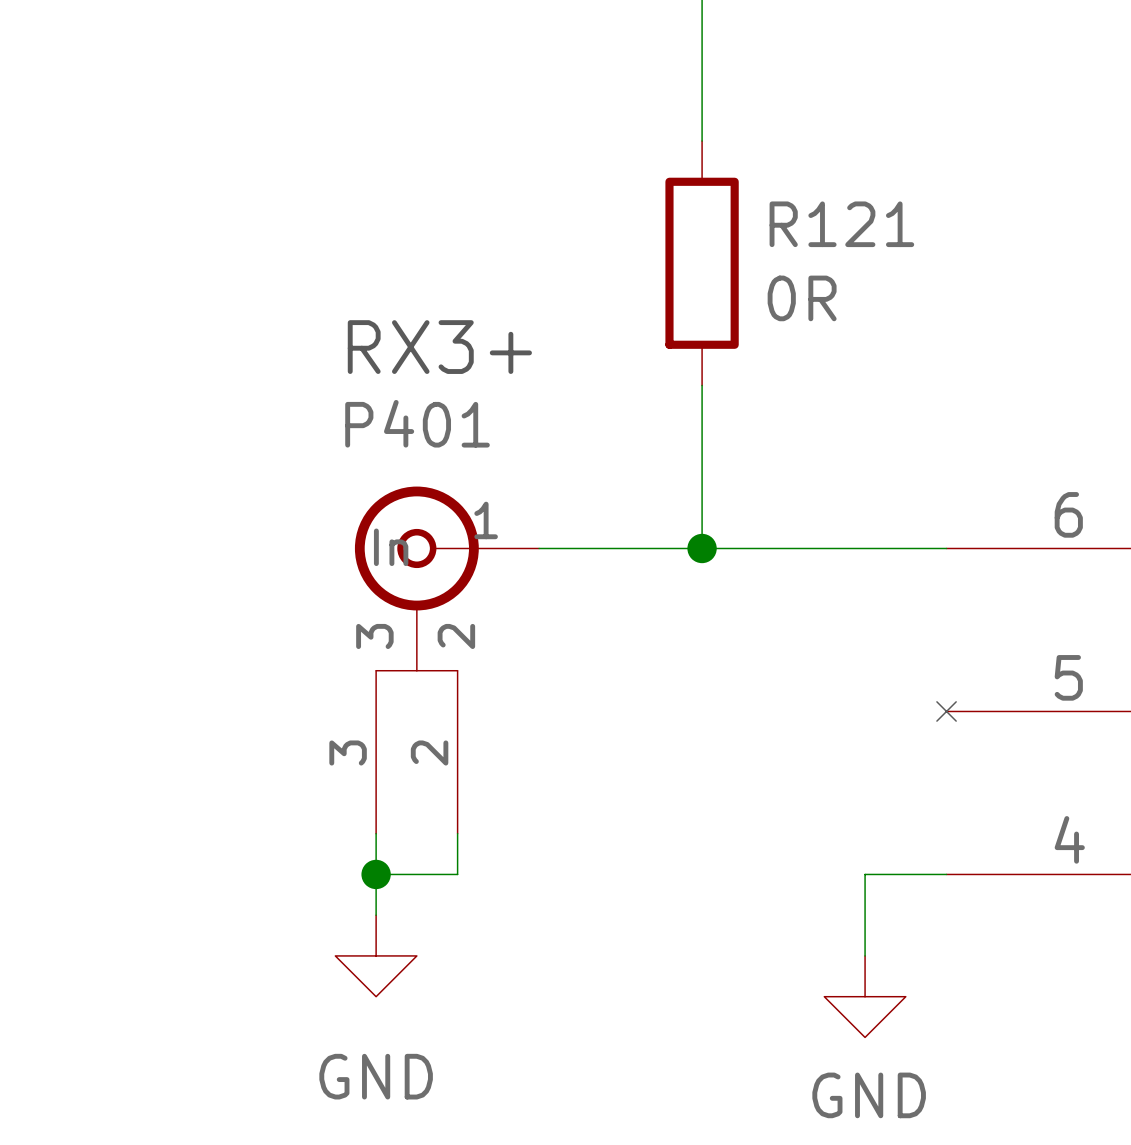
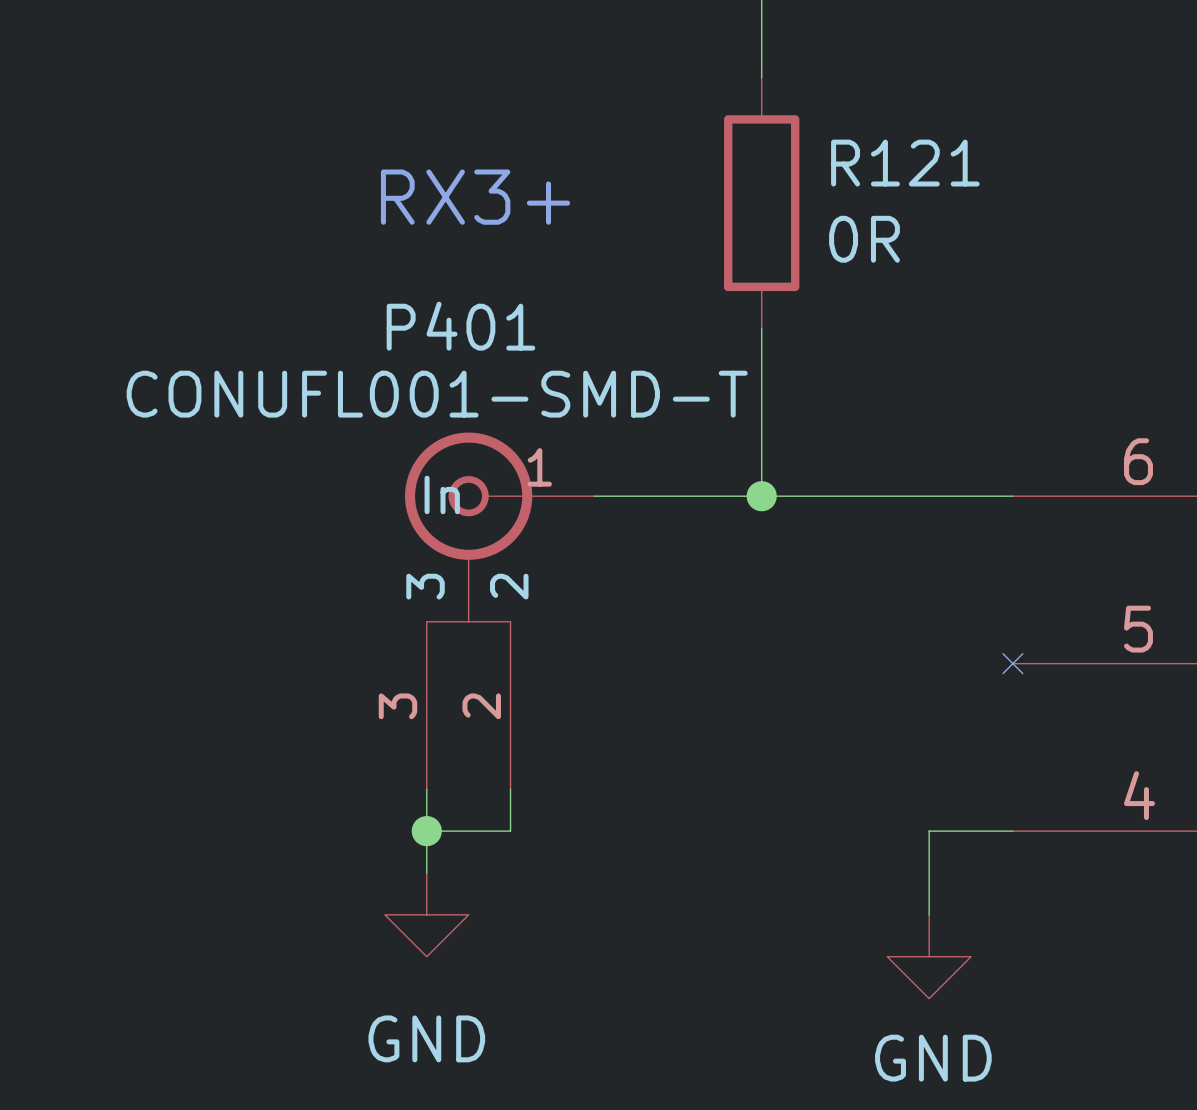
text position: RX3+ (439, 347) -> RX3+ (475, 197)
P401 name position: P401 (417, 423) -> P401 (460, 326)
P401 value: none -> CONUFL001-SMD-T (437, 394)

